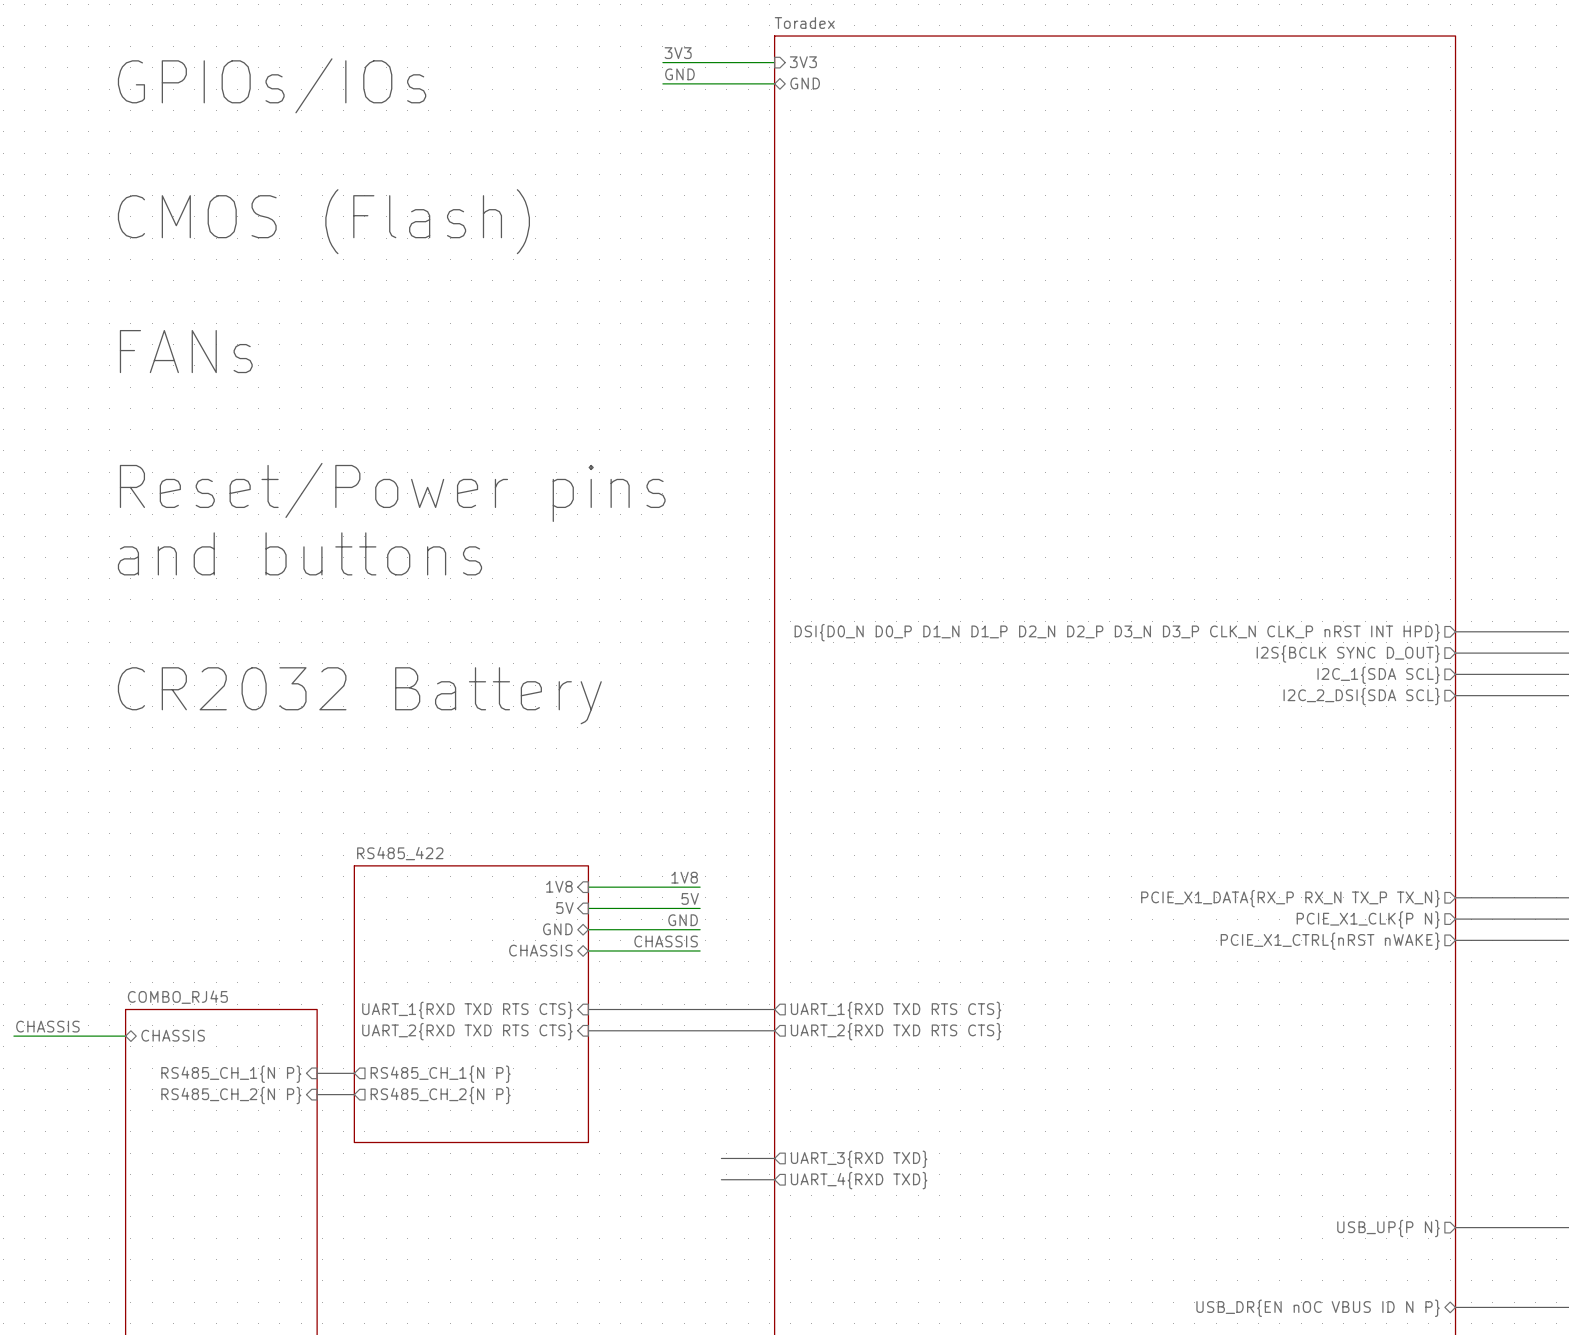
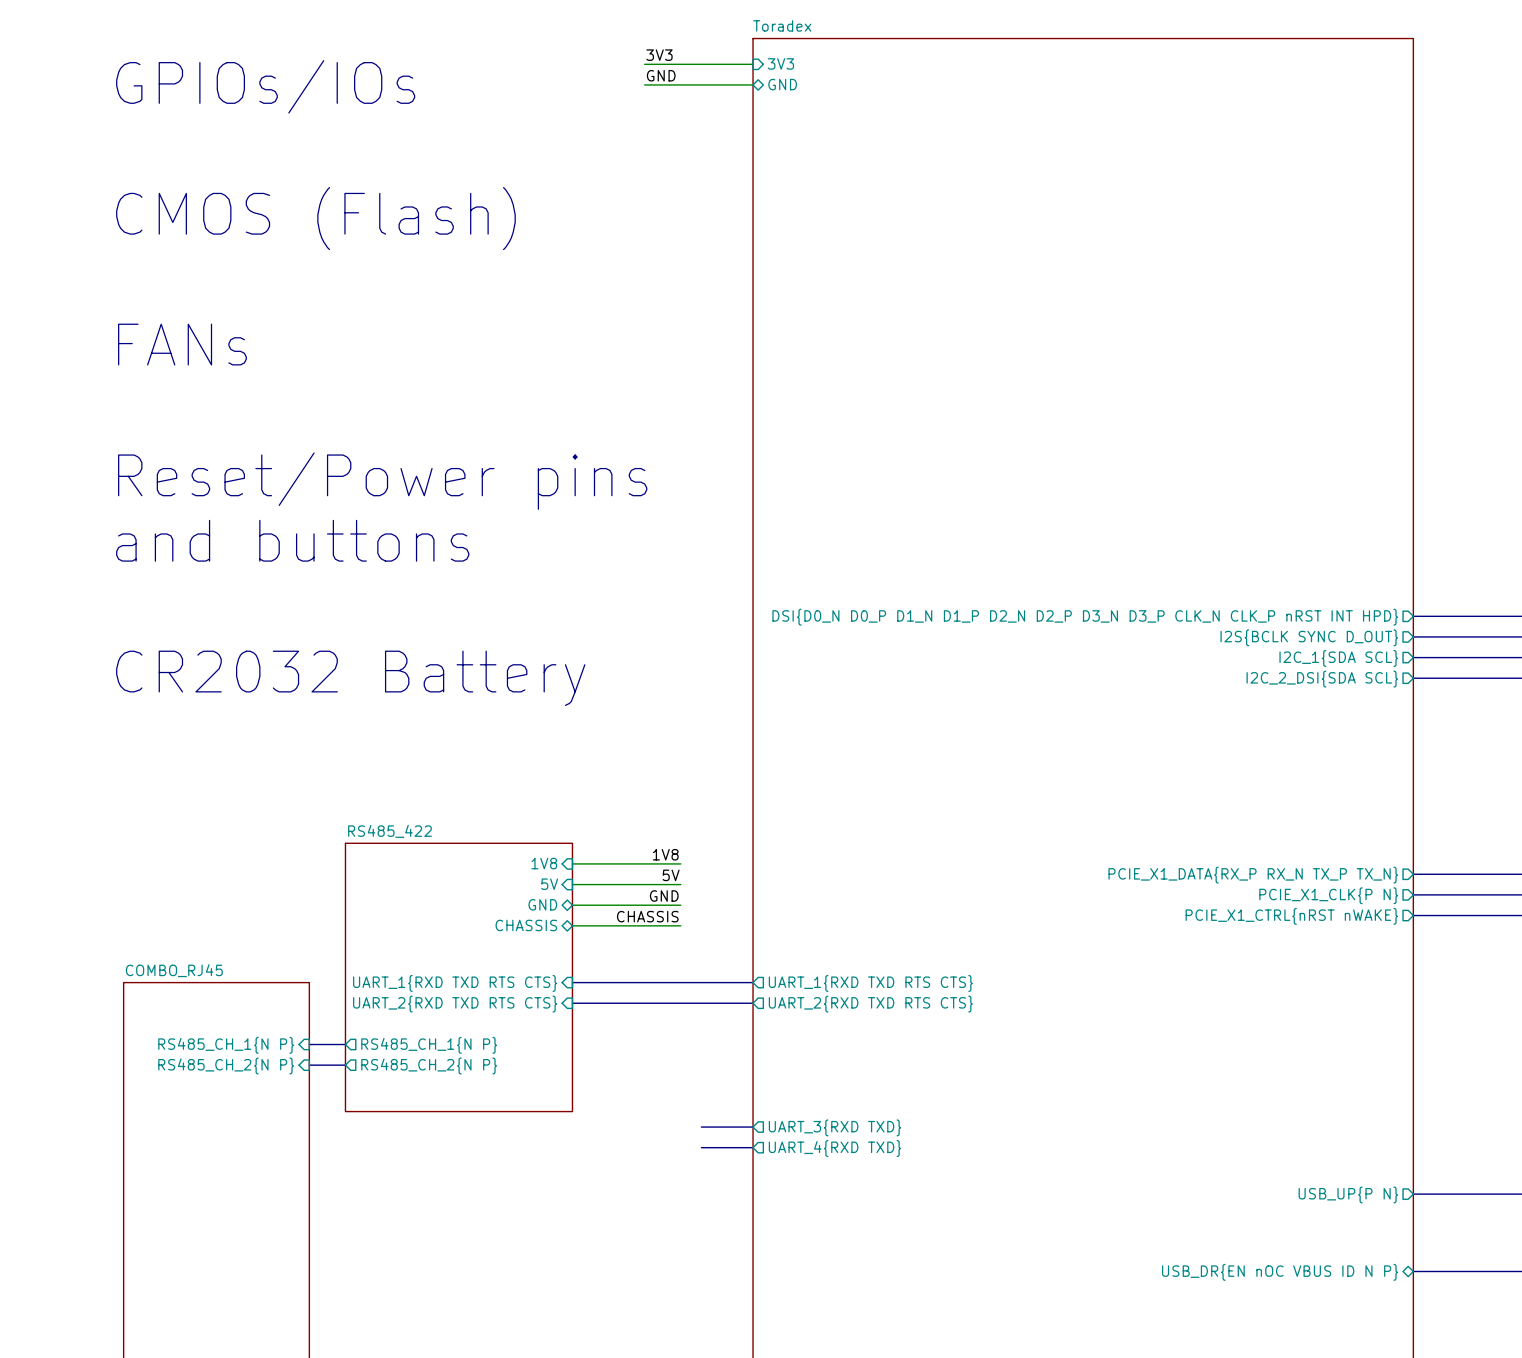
label: CHASSIS (47, 1026) -> none
sheet pin: CHASSIS (173, 1035) -> none
wire: (13, 1036) (125, 1036) -> none

